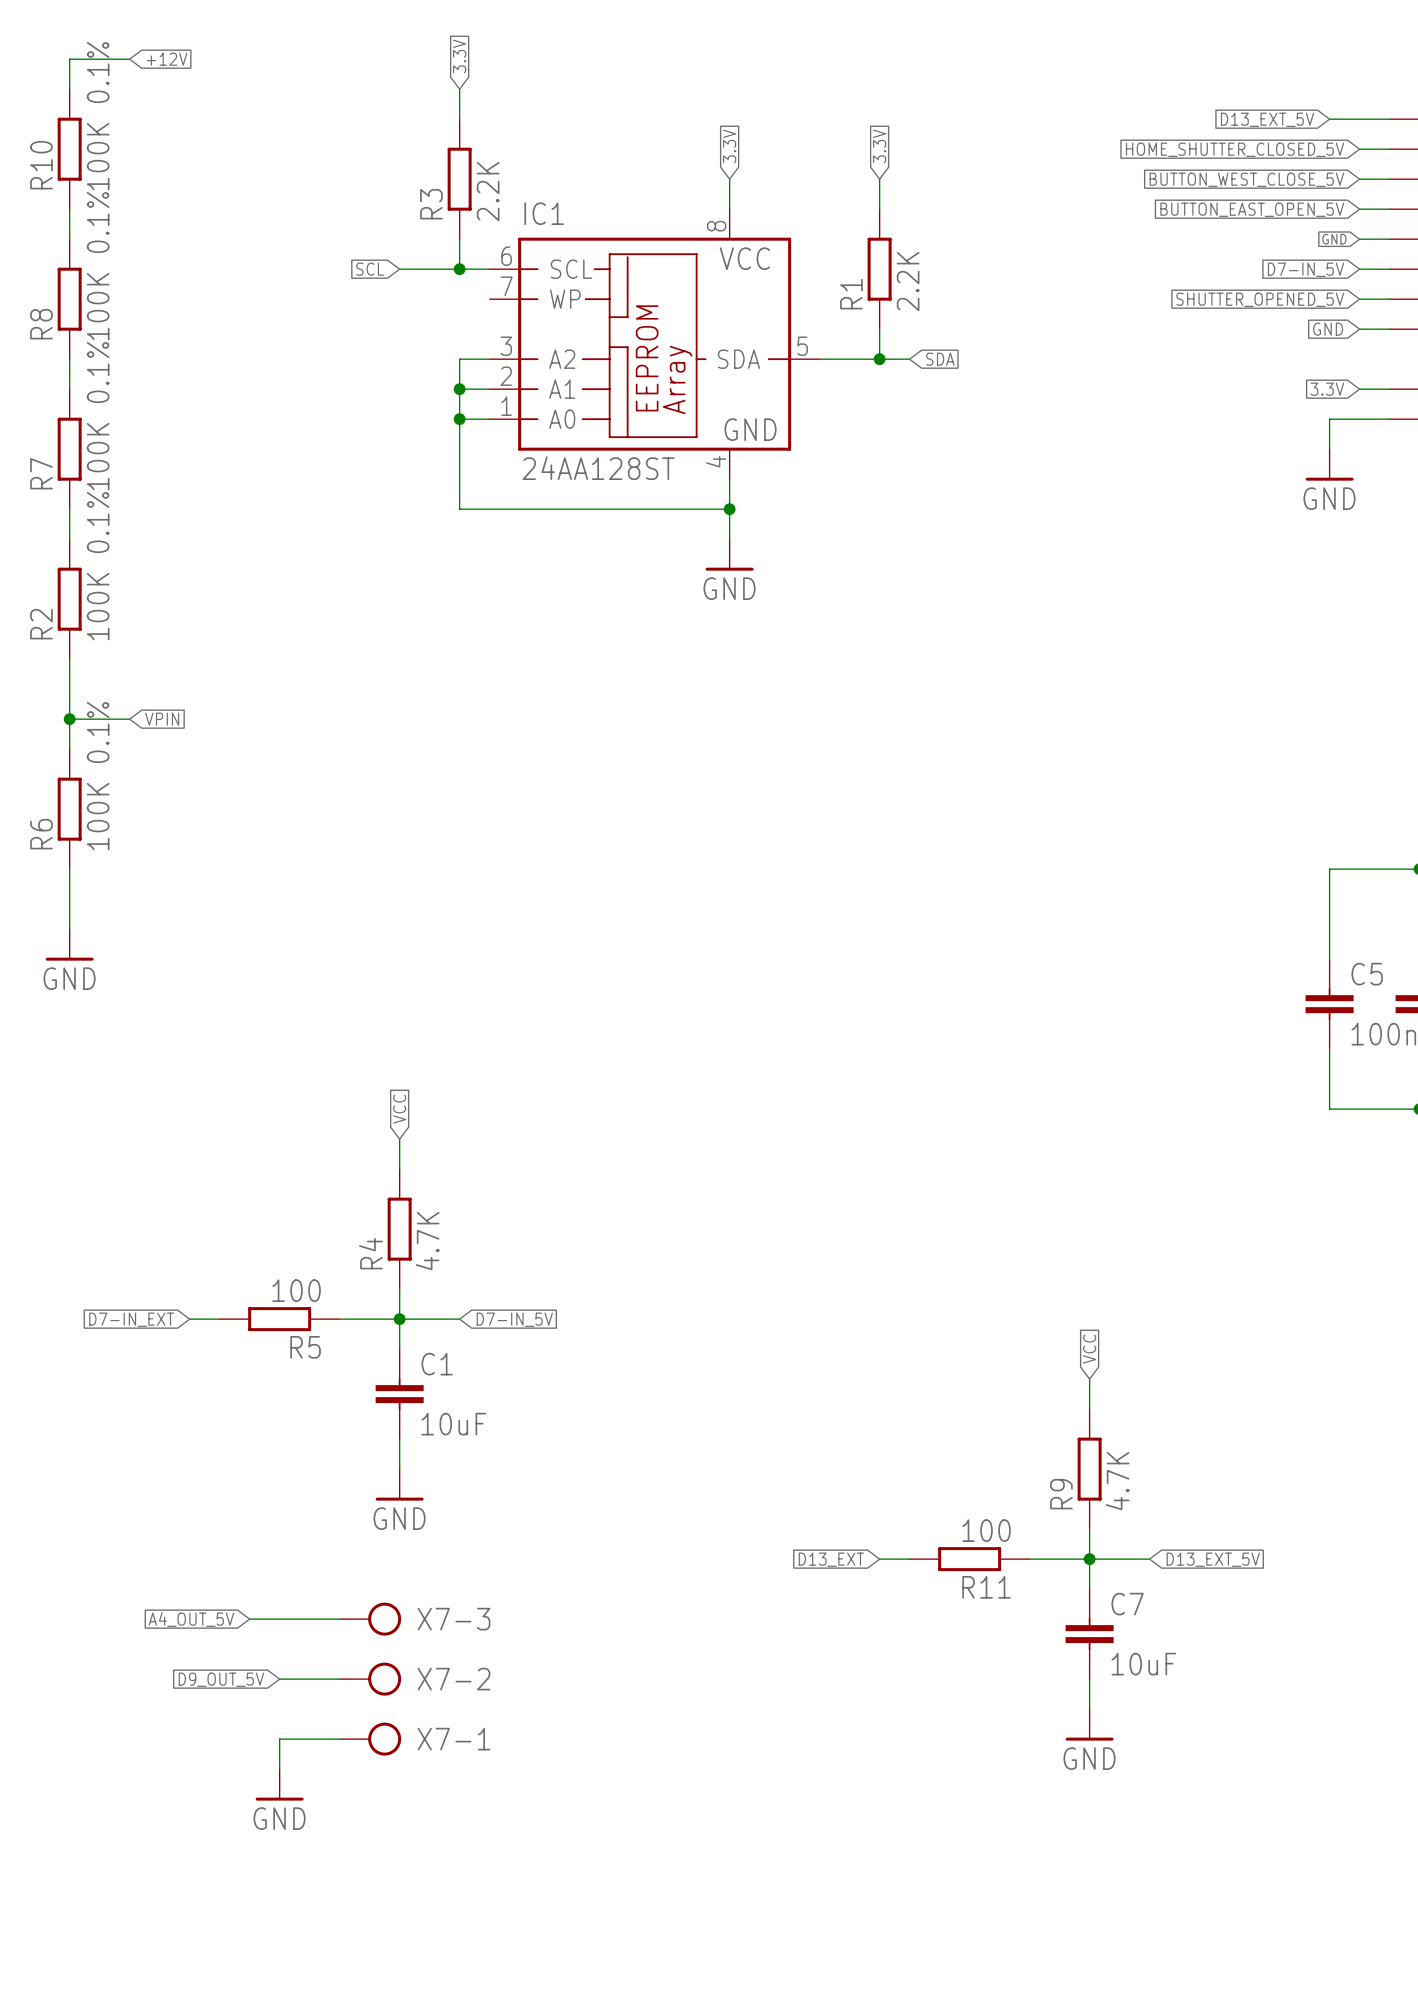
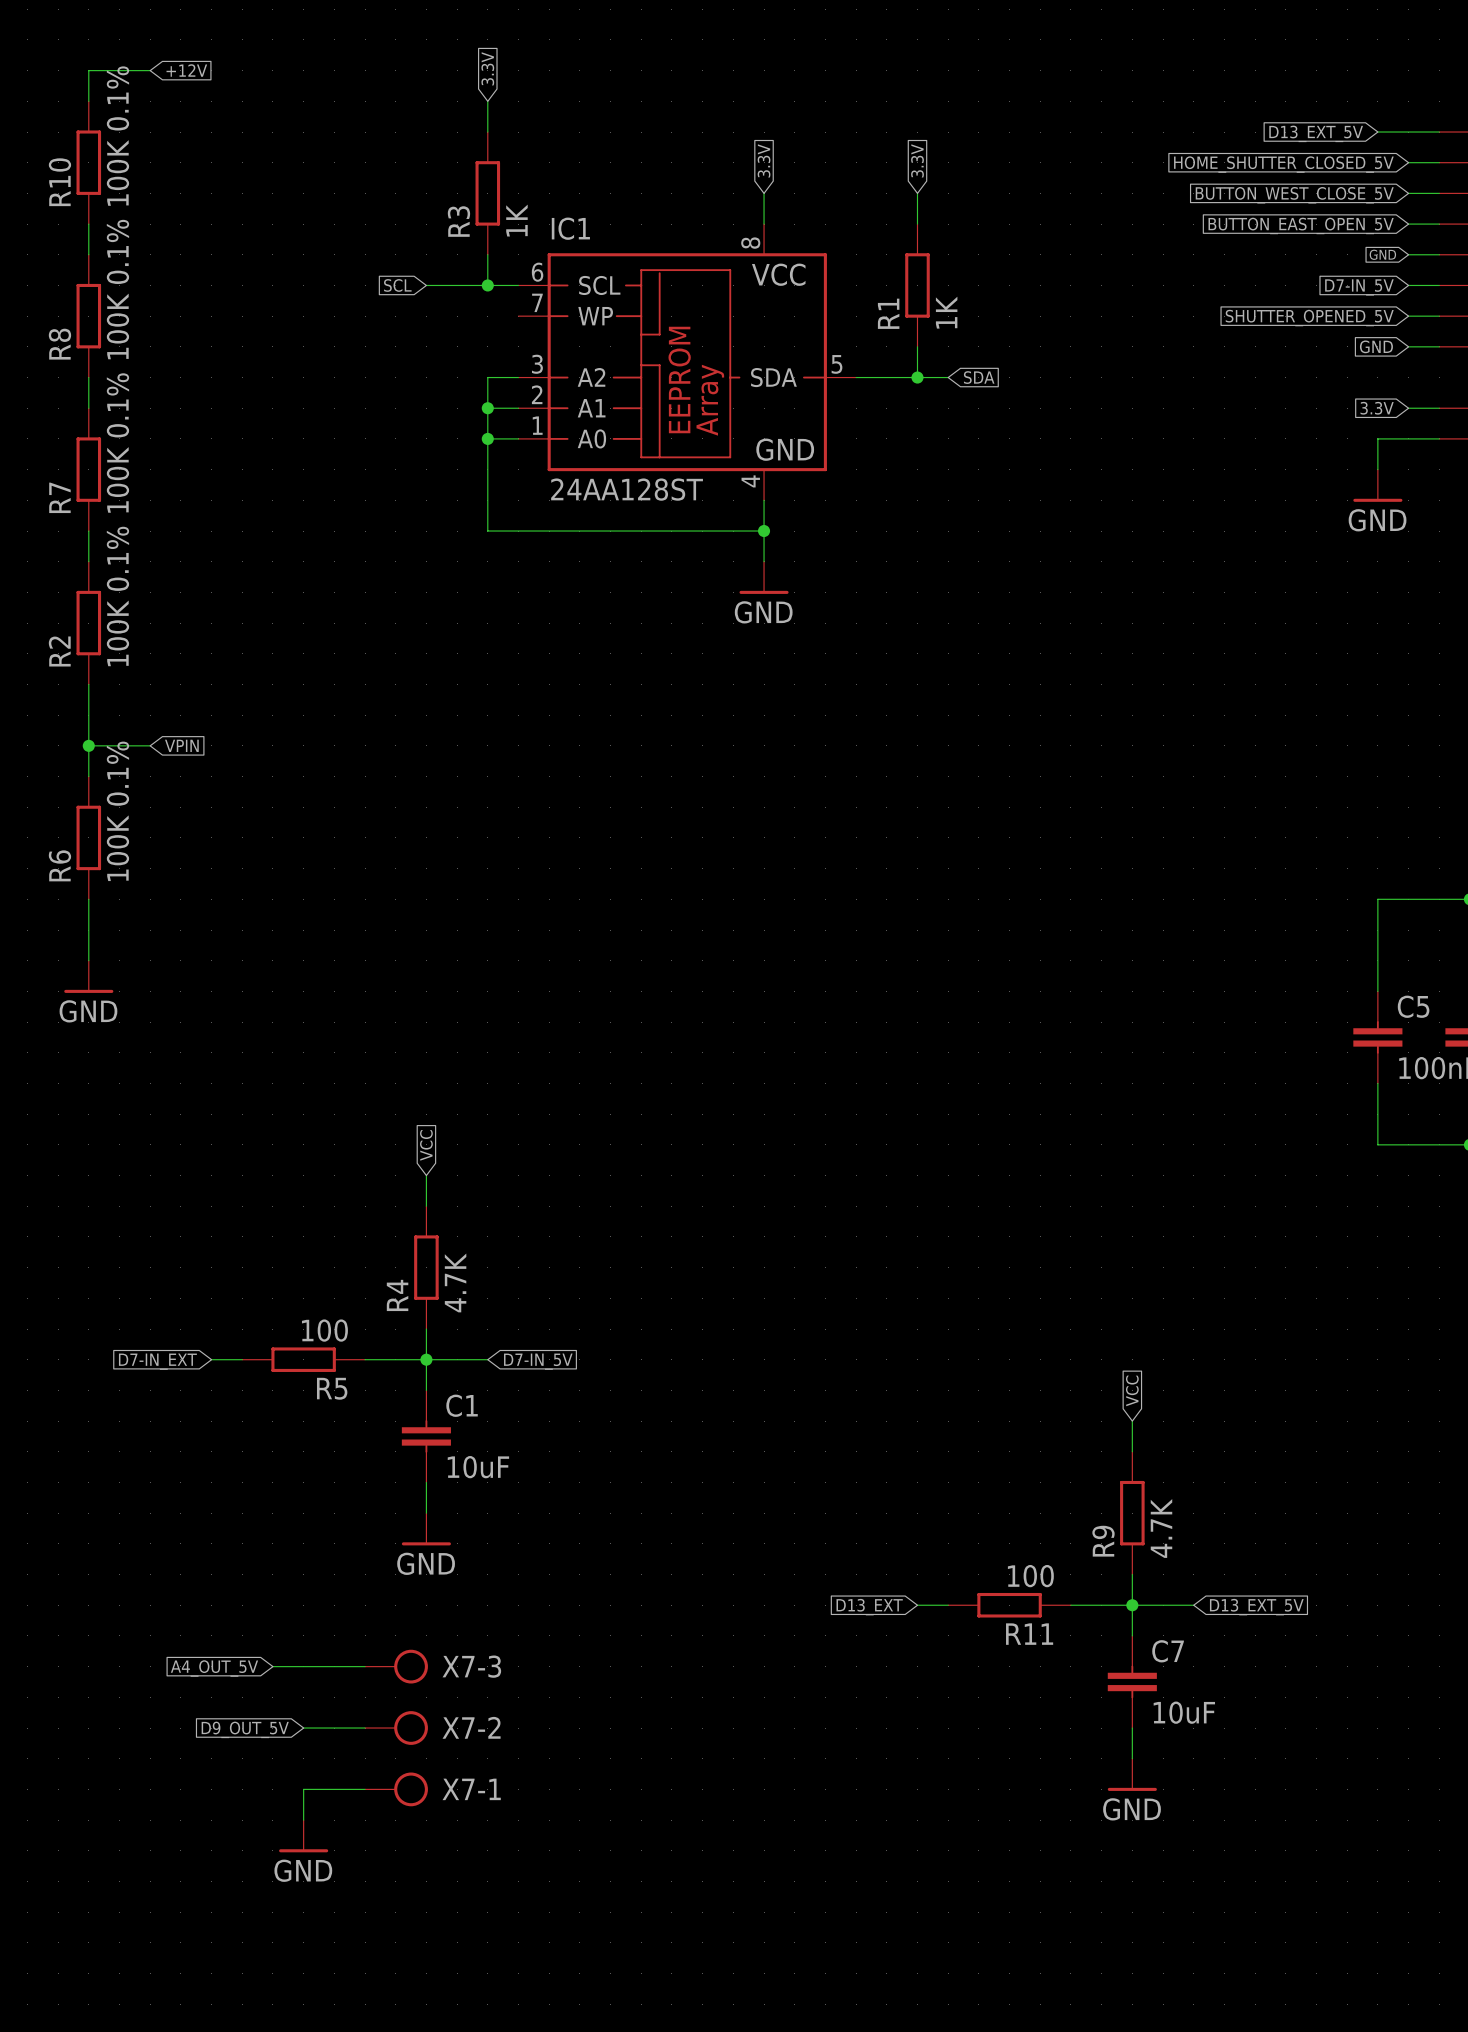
R3 value: 2.2K (488, 191) -> 1K (516, 220)
R1 value: 2.2K (908, 281) -> 1K (946, 312)

